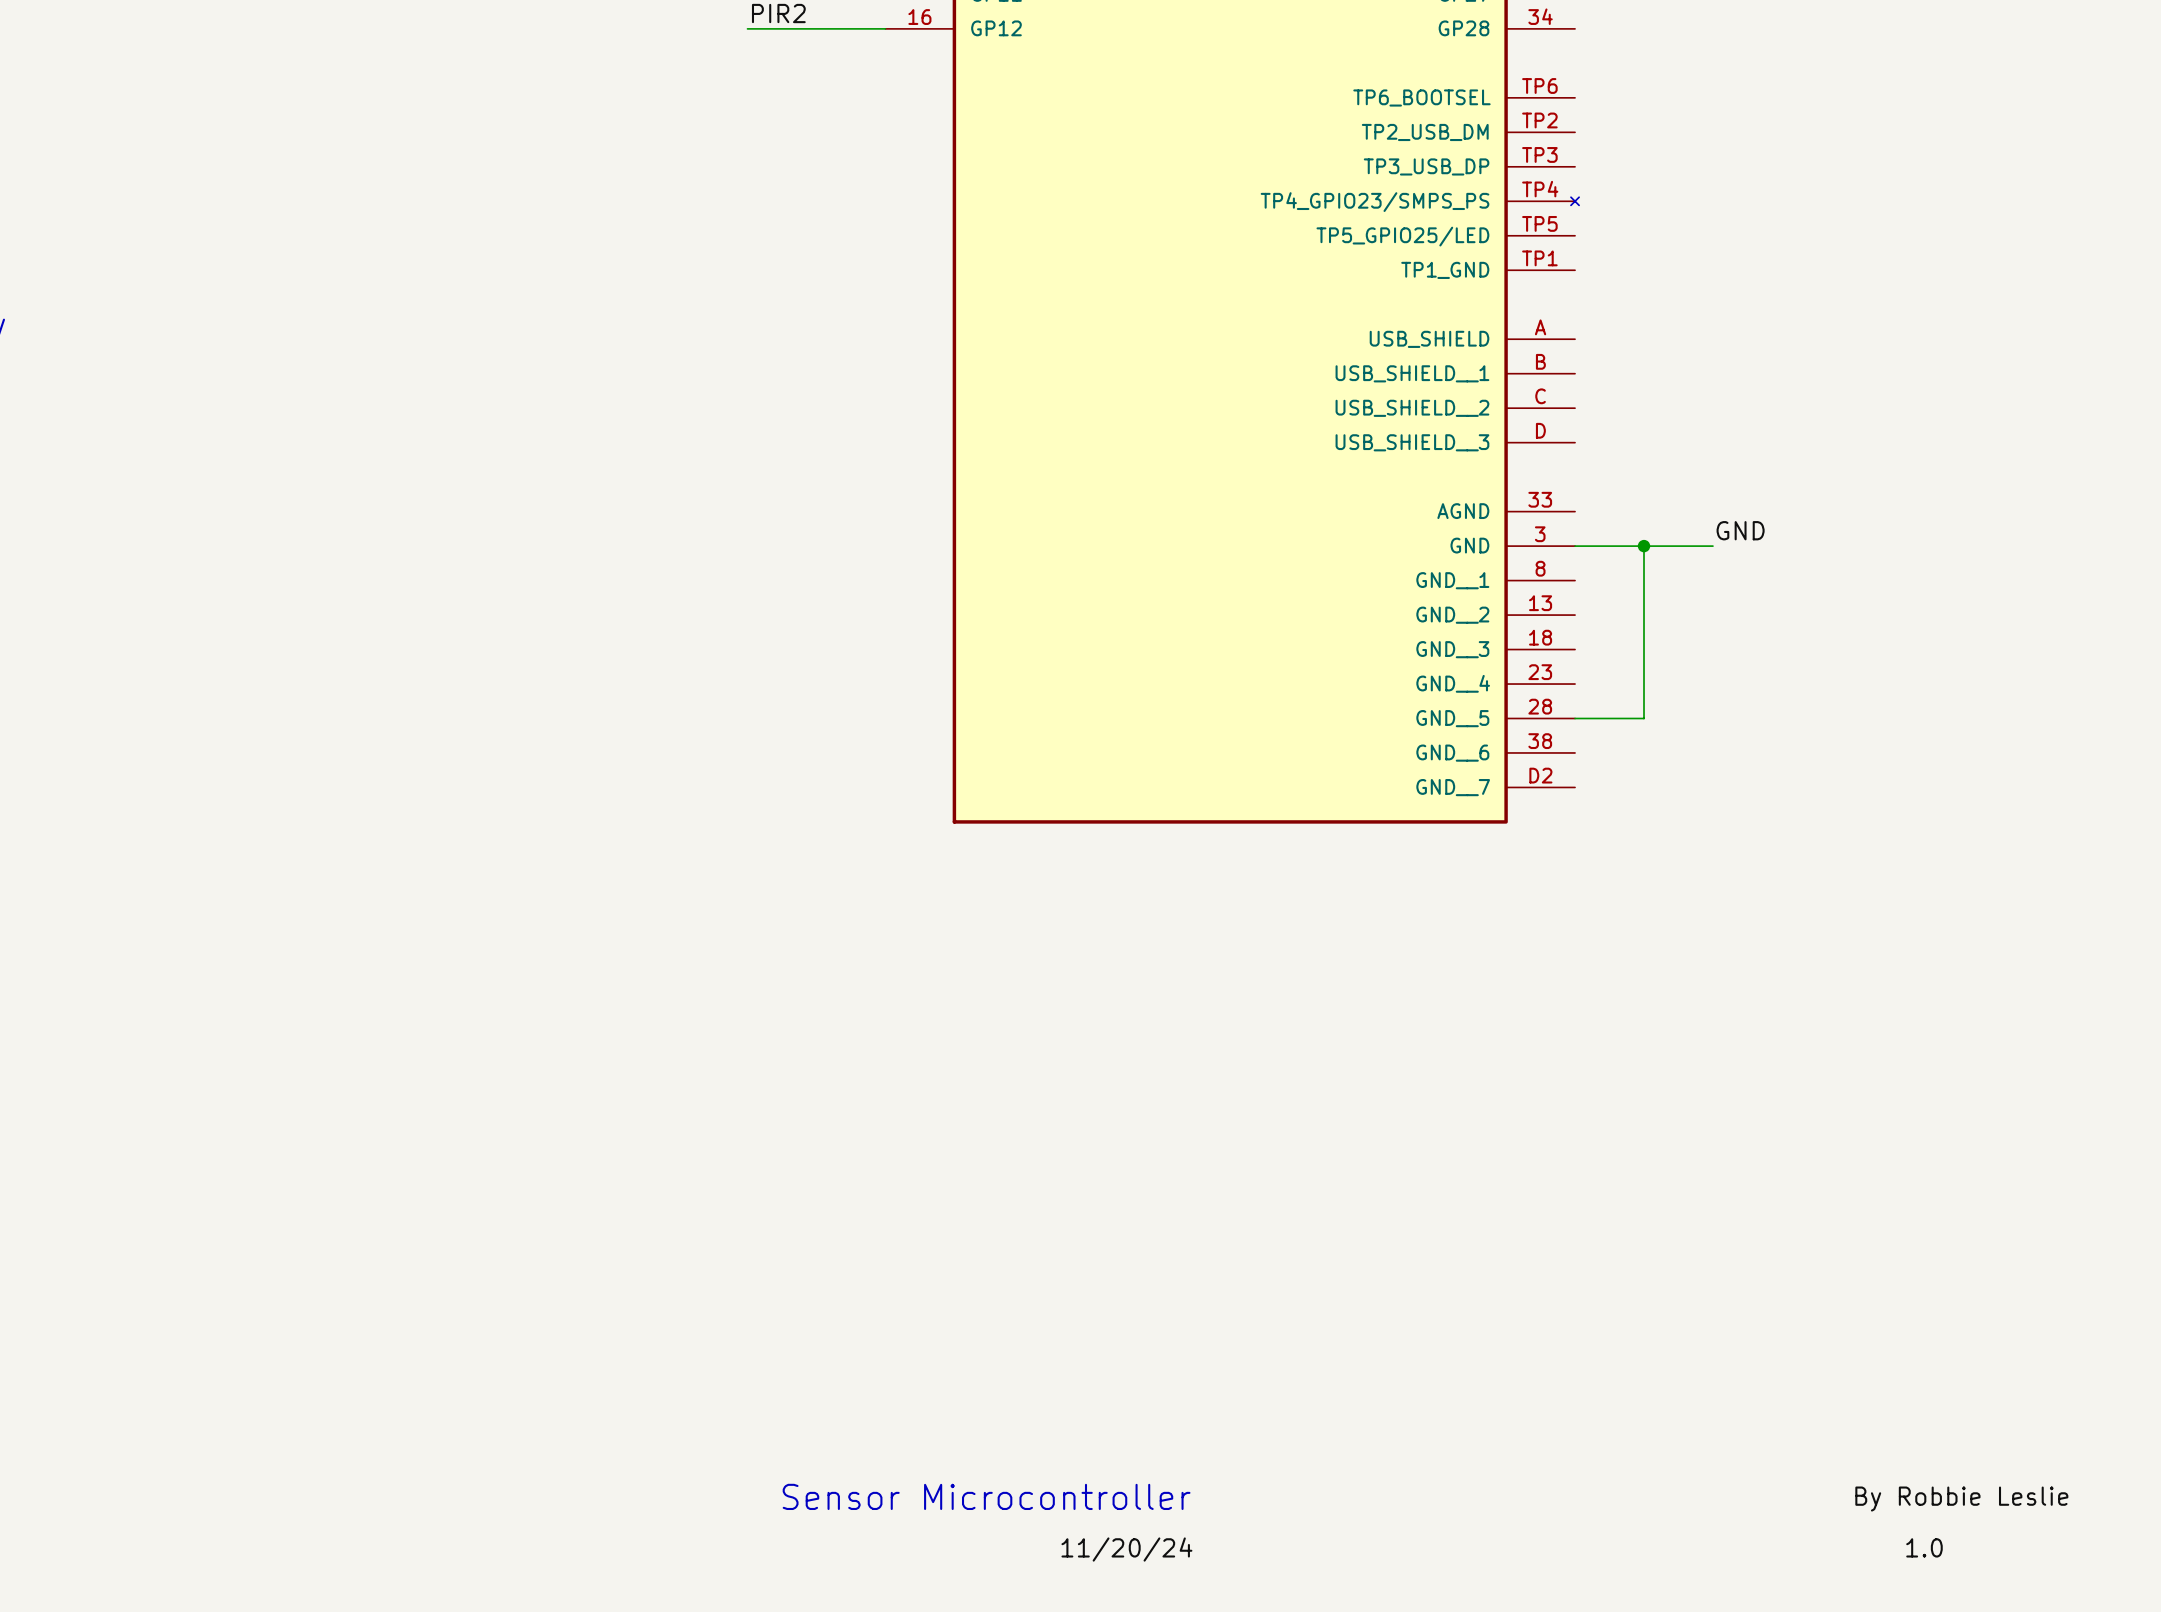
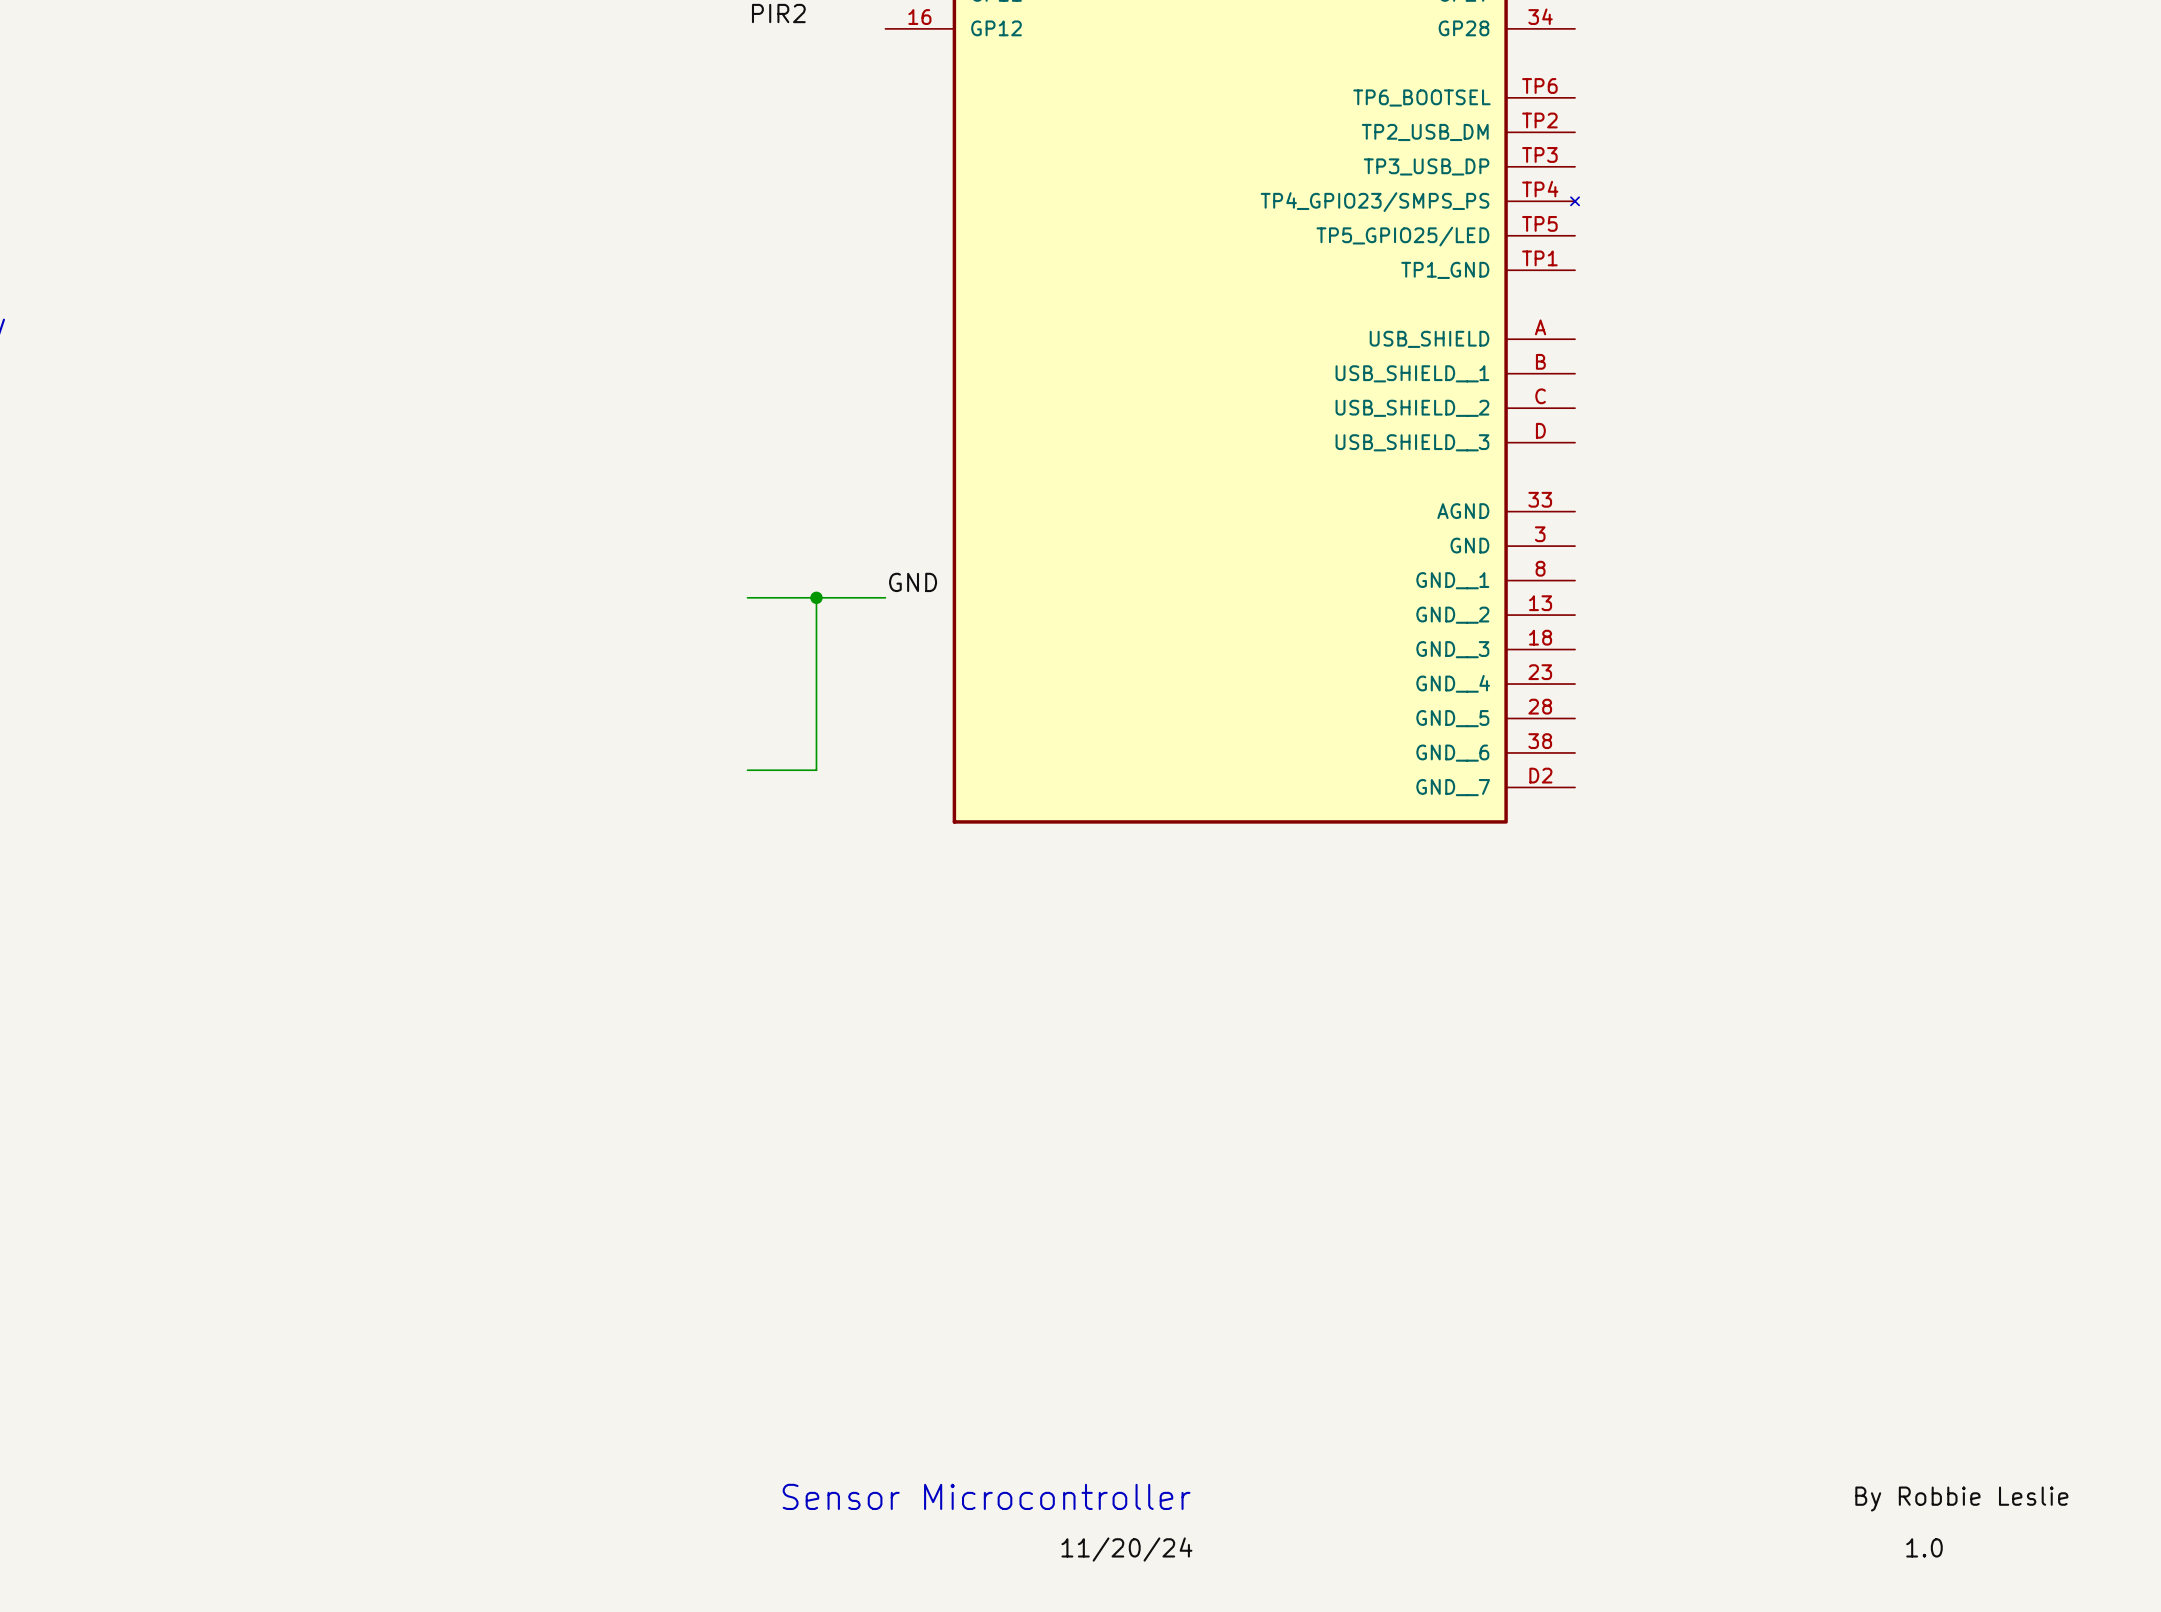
wire: (747, 28) (885, 28) -> none
label: GND (1740, 530) -> none
wire: (1575, 546) (1712, 546) -> none
wire: (1644, 546) (1644, 718) (1575, 718) -> none
junction: (1644, 546) -> none
label: none -> GND (913, 582)
wire: none -> (747, 597) (885, 597)
wire: none -> (816, 597) (816, 770) (747, 770)
junction: none -> (816, 597)

